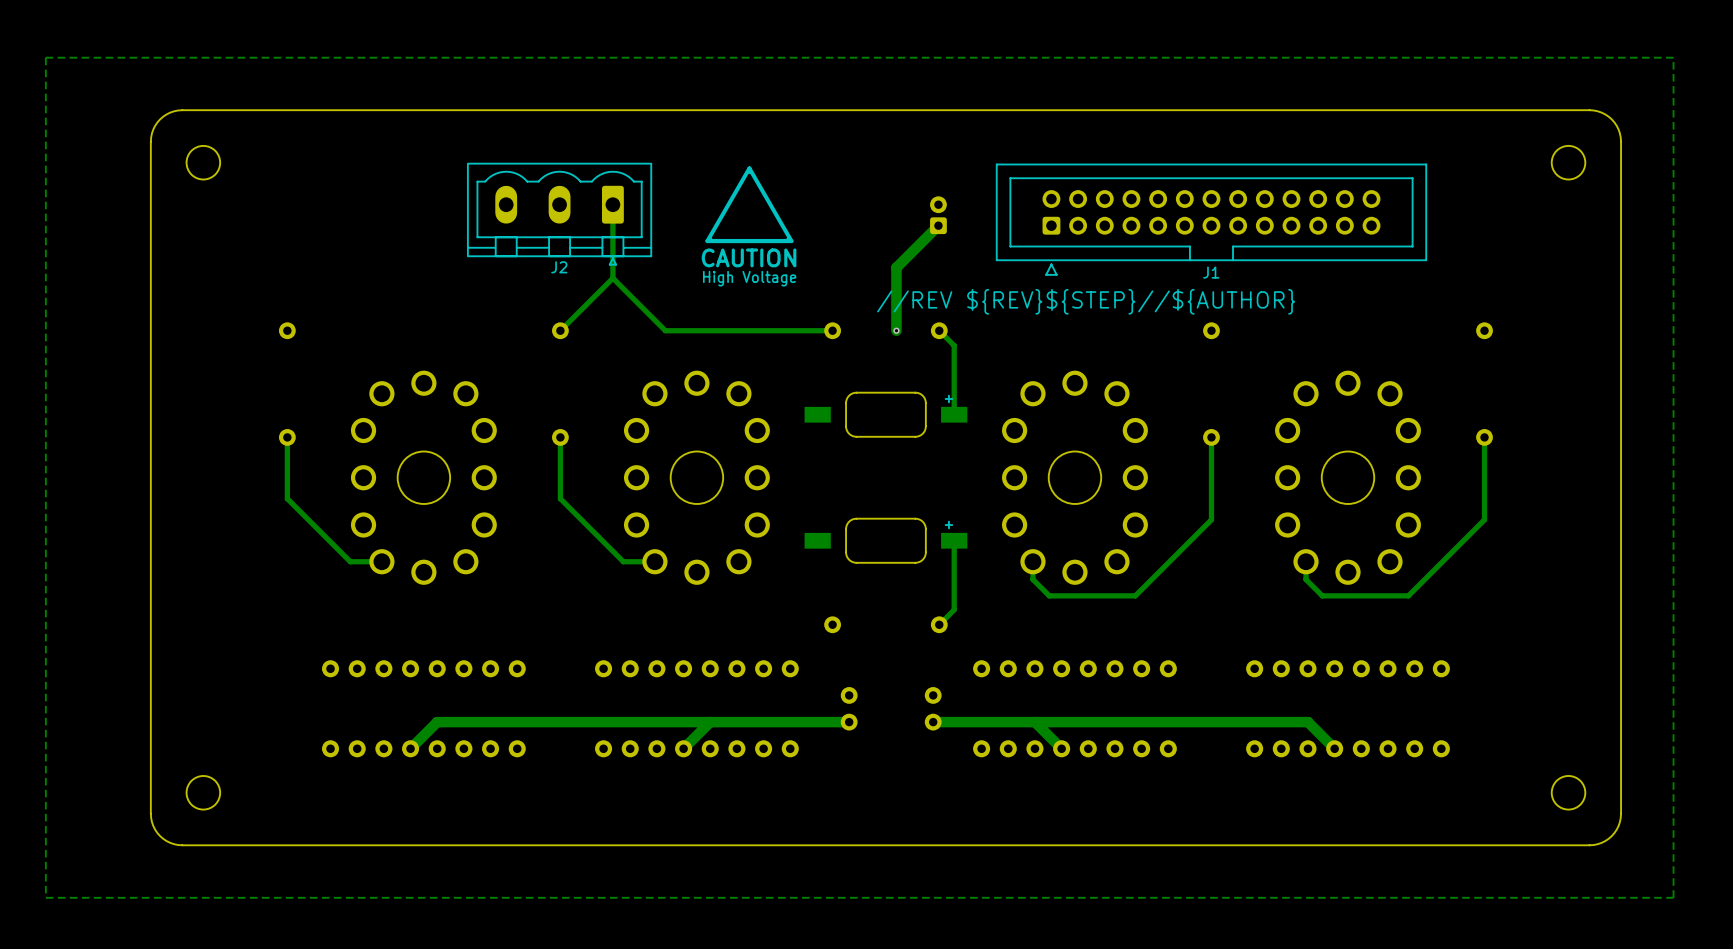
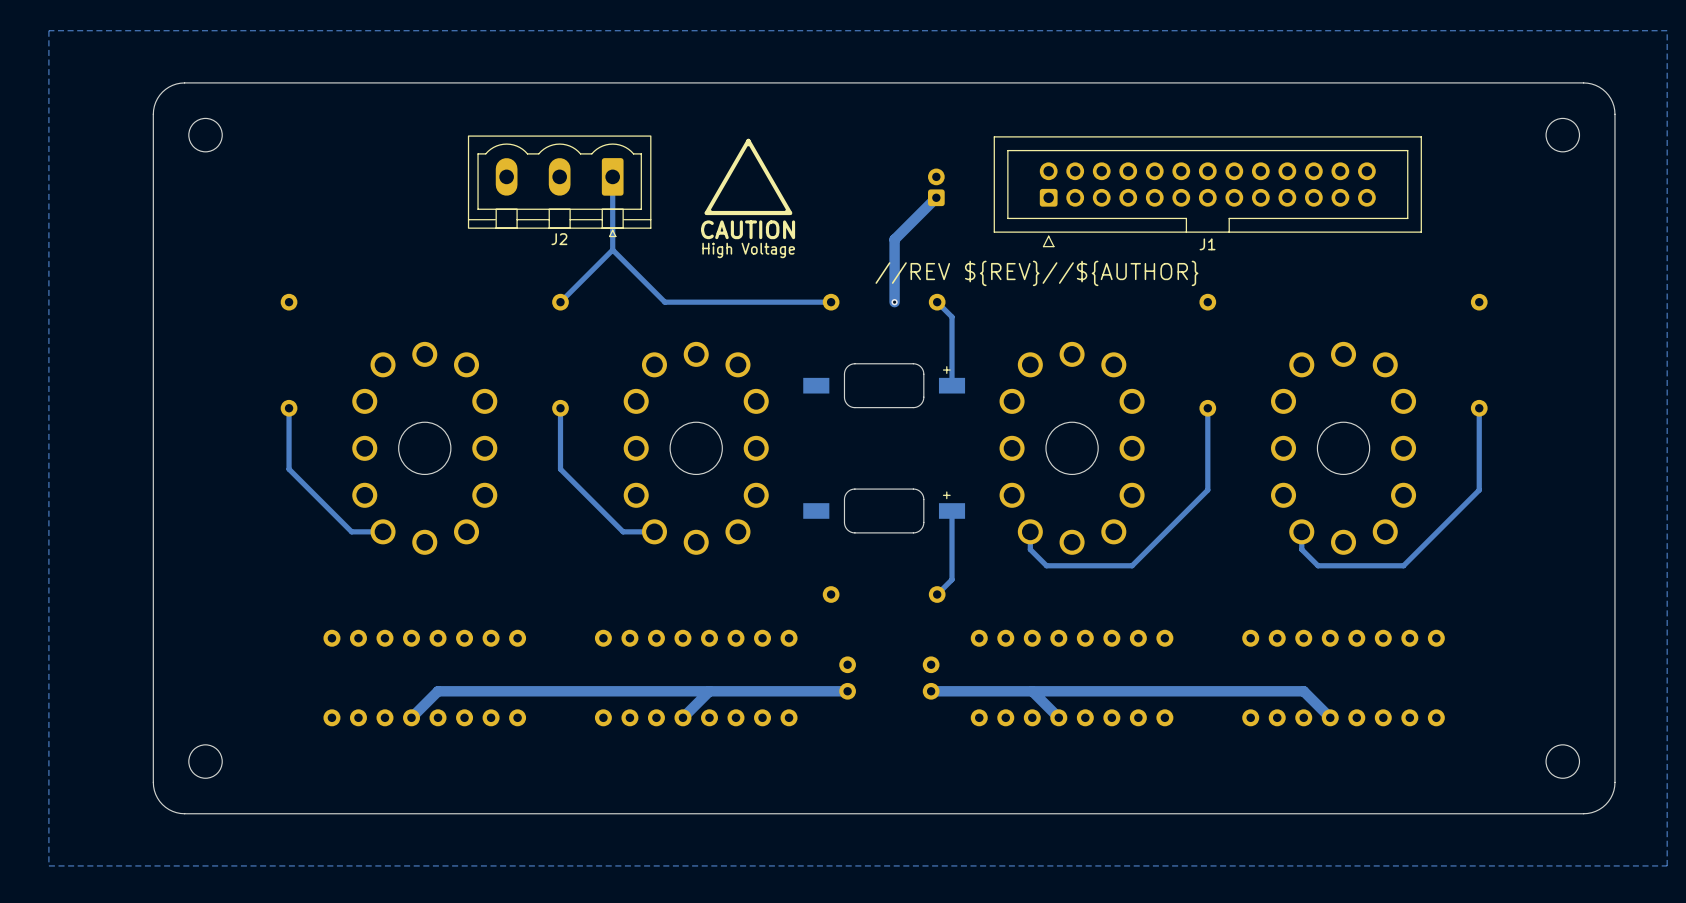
text: //REV ${REV}${STEP}//${AUTHOR} (1086, 301) -> //REV ${REV}//${AUTHOR} (1036, 273)

